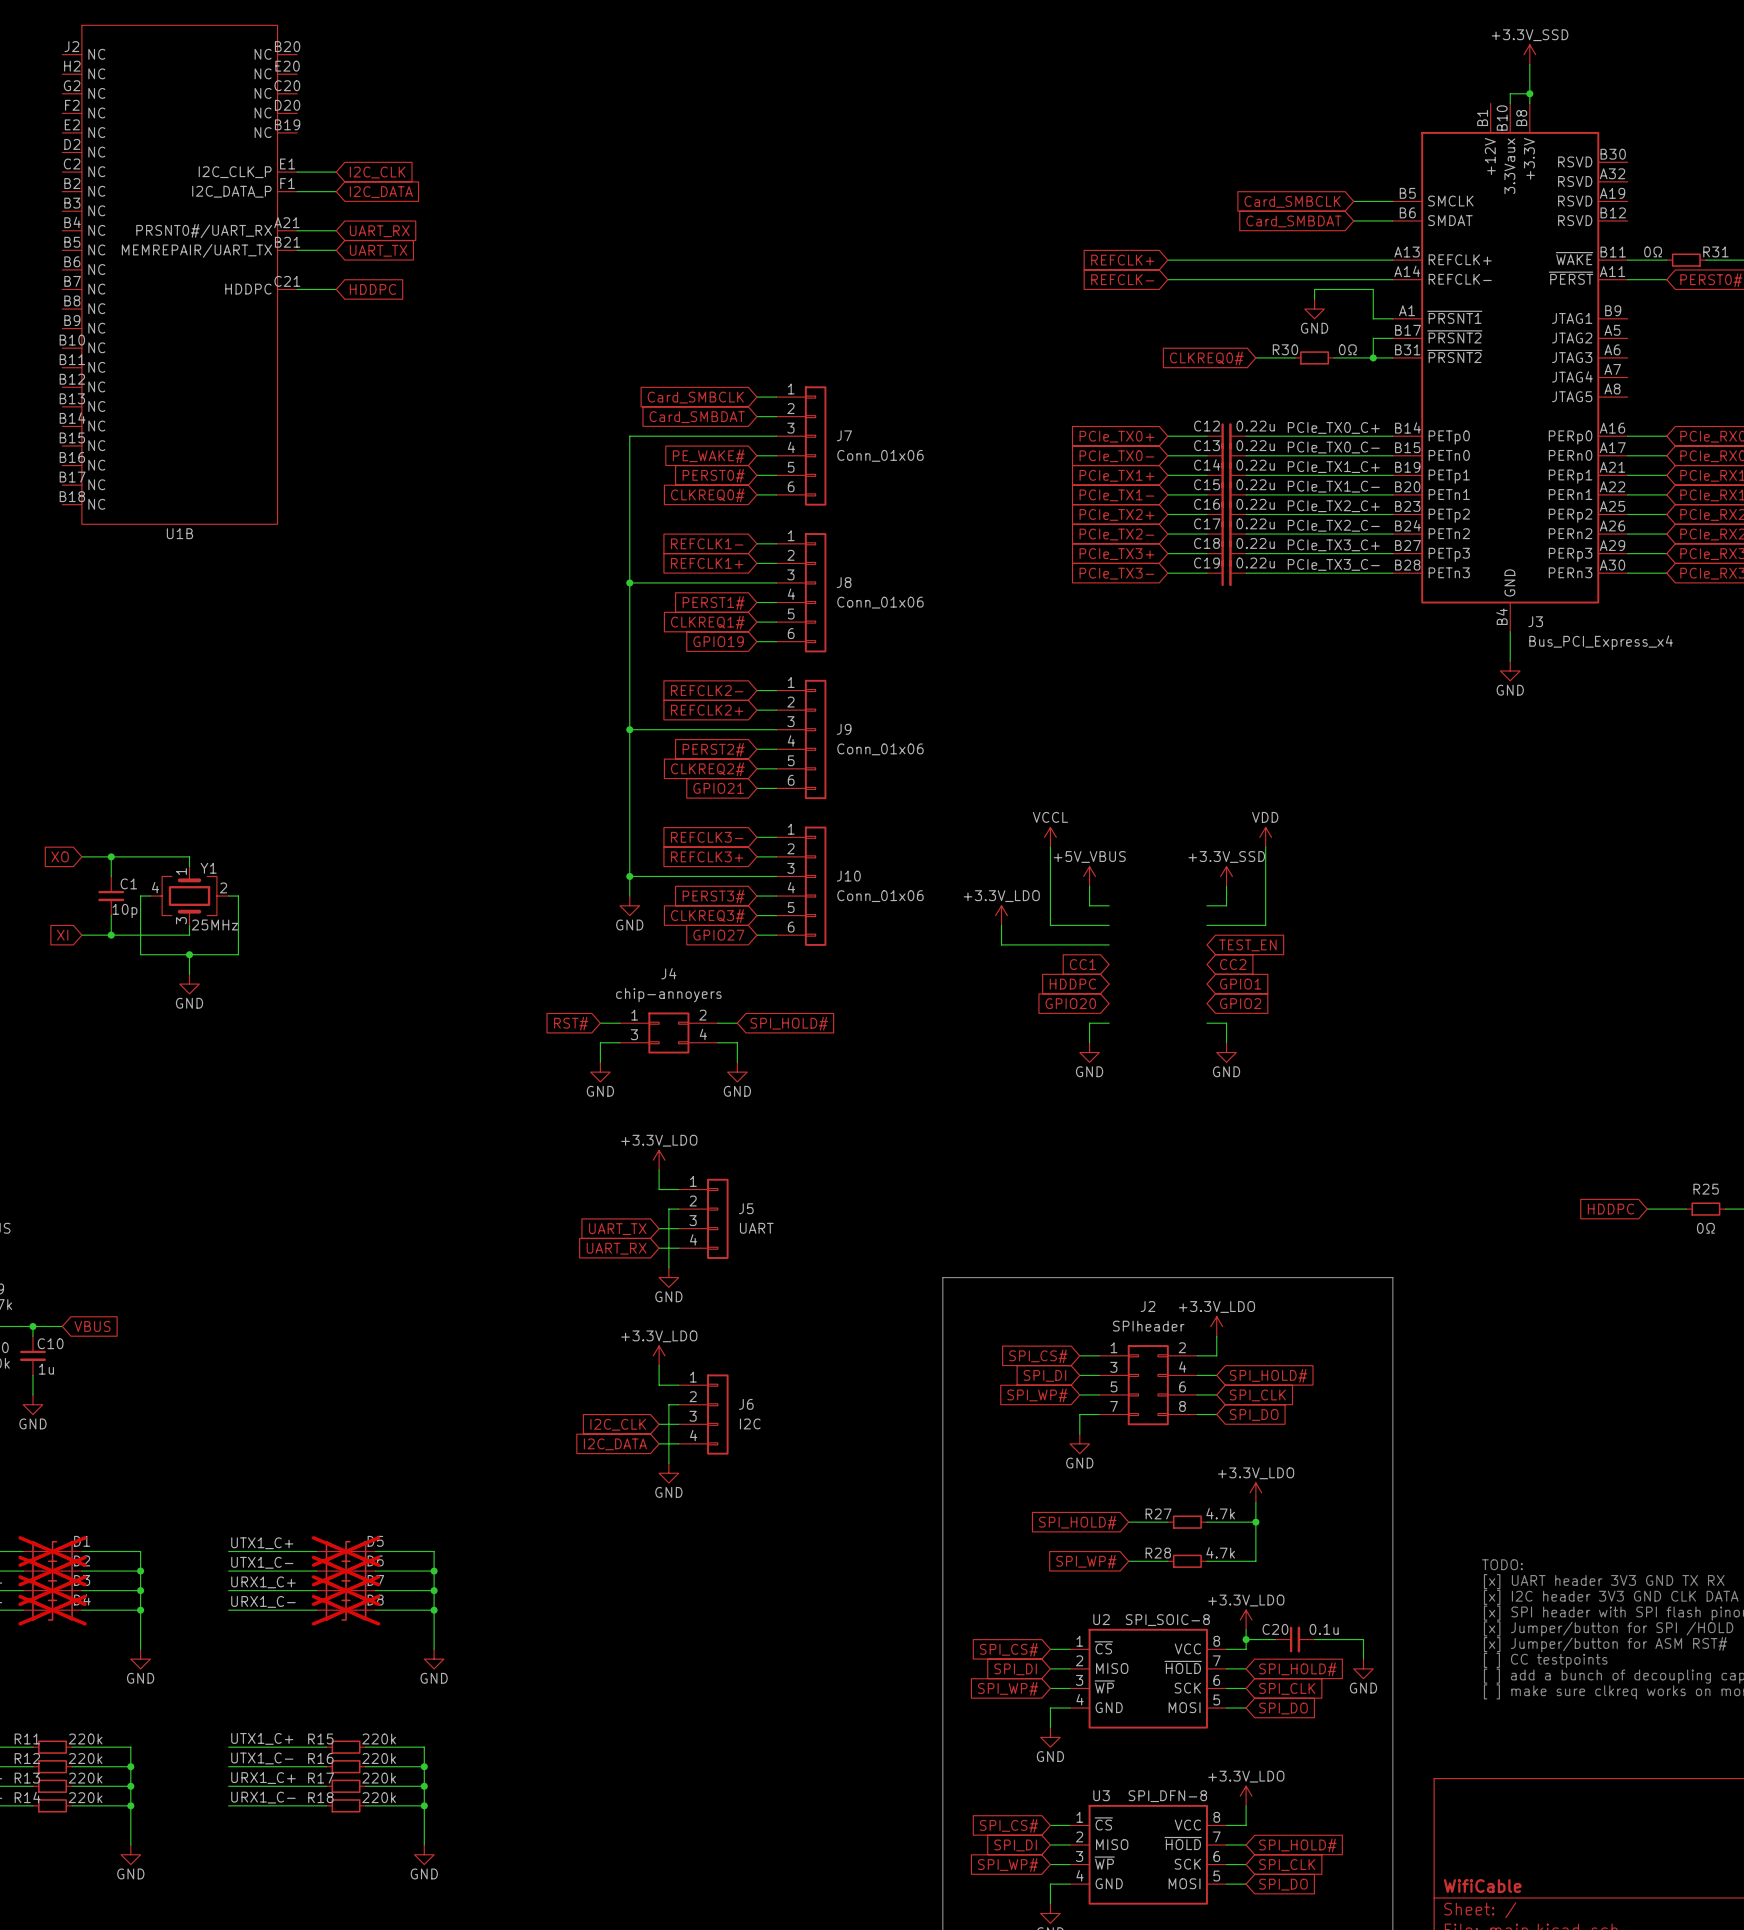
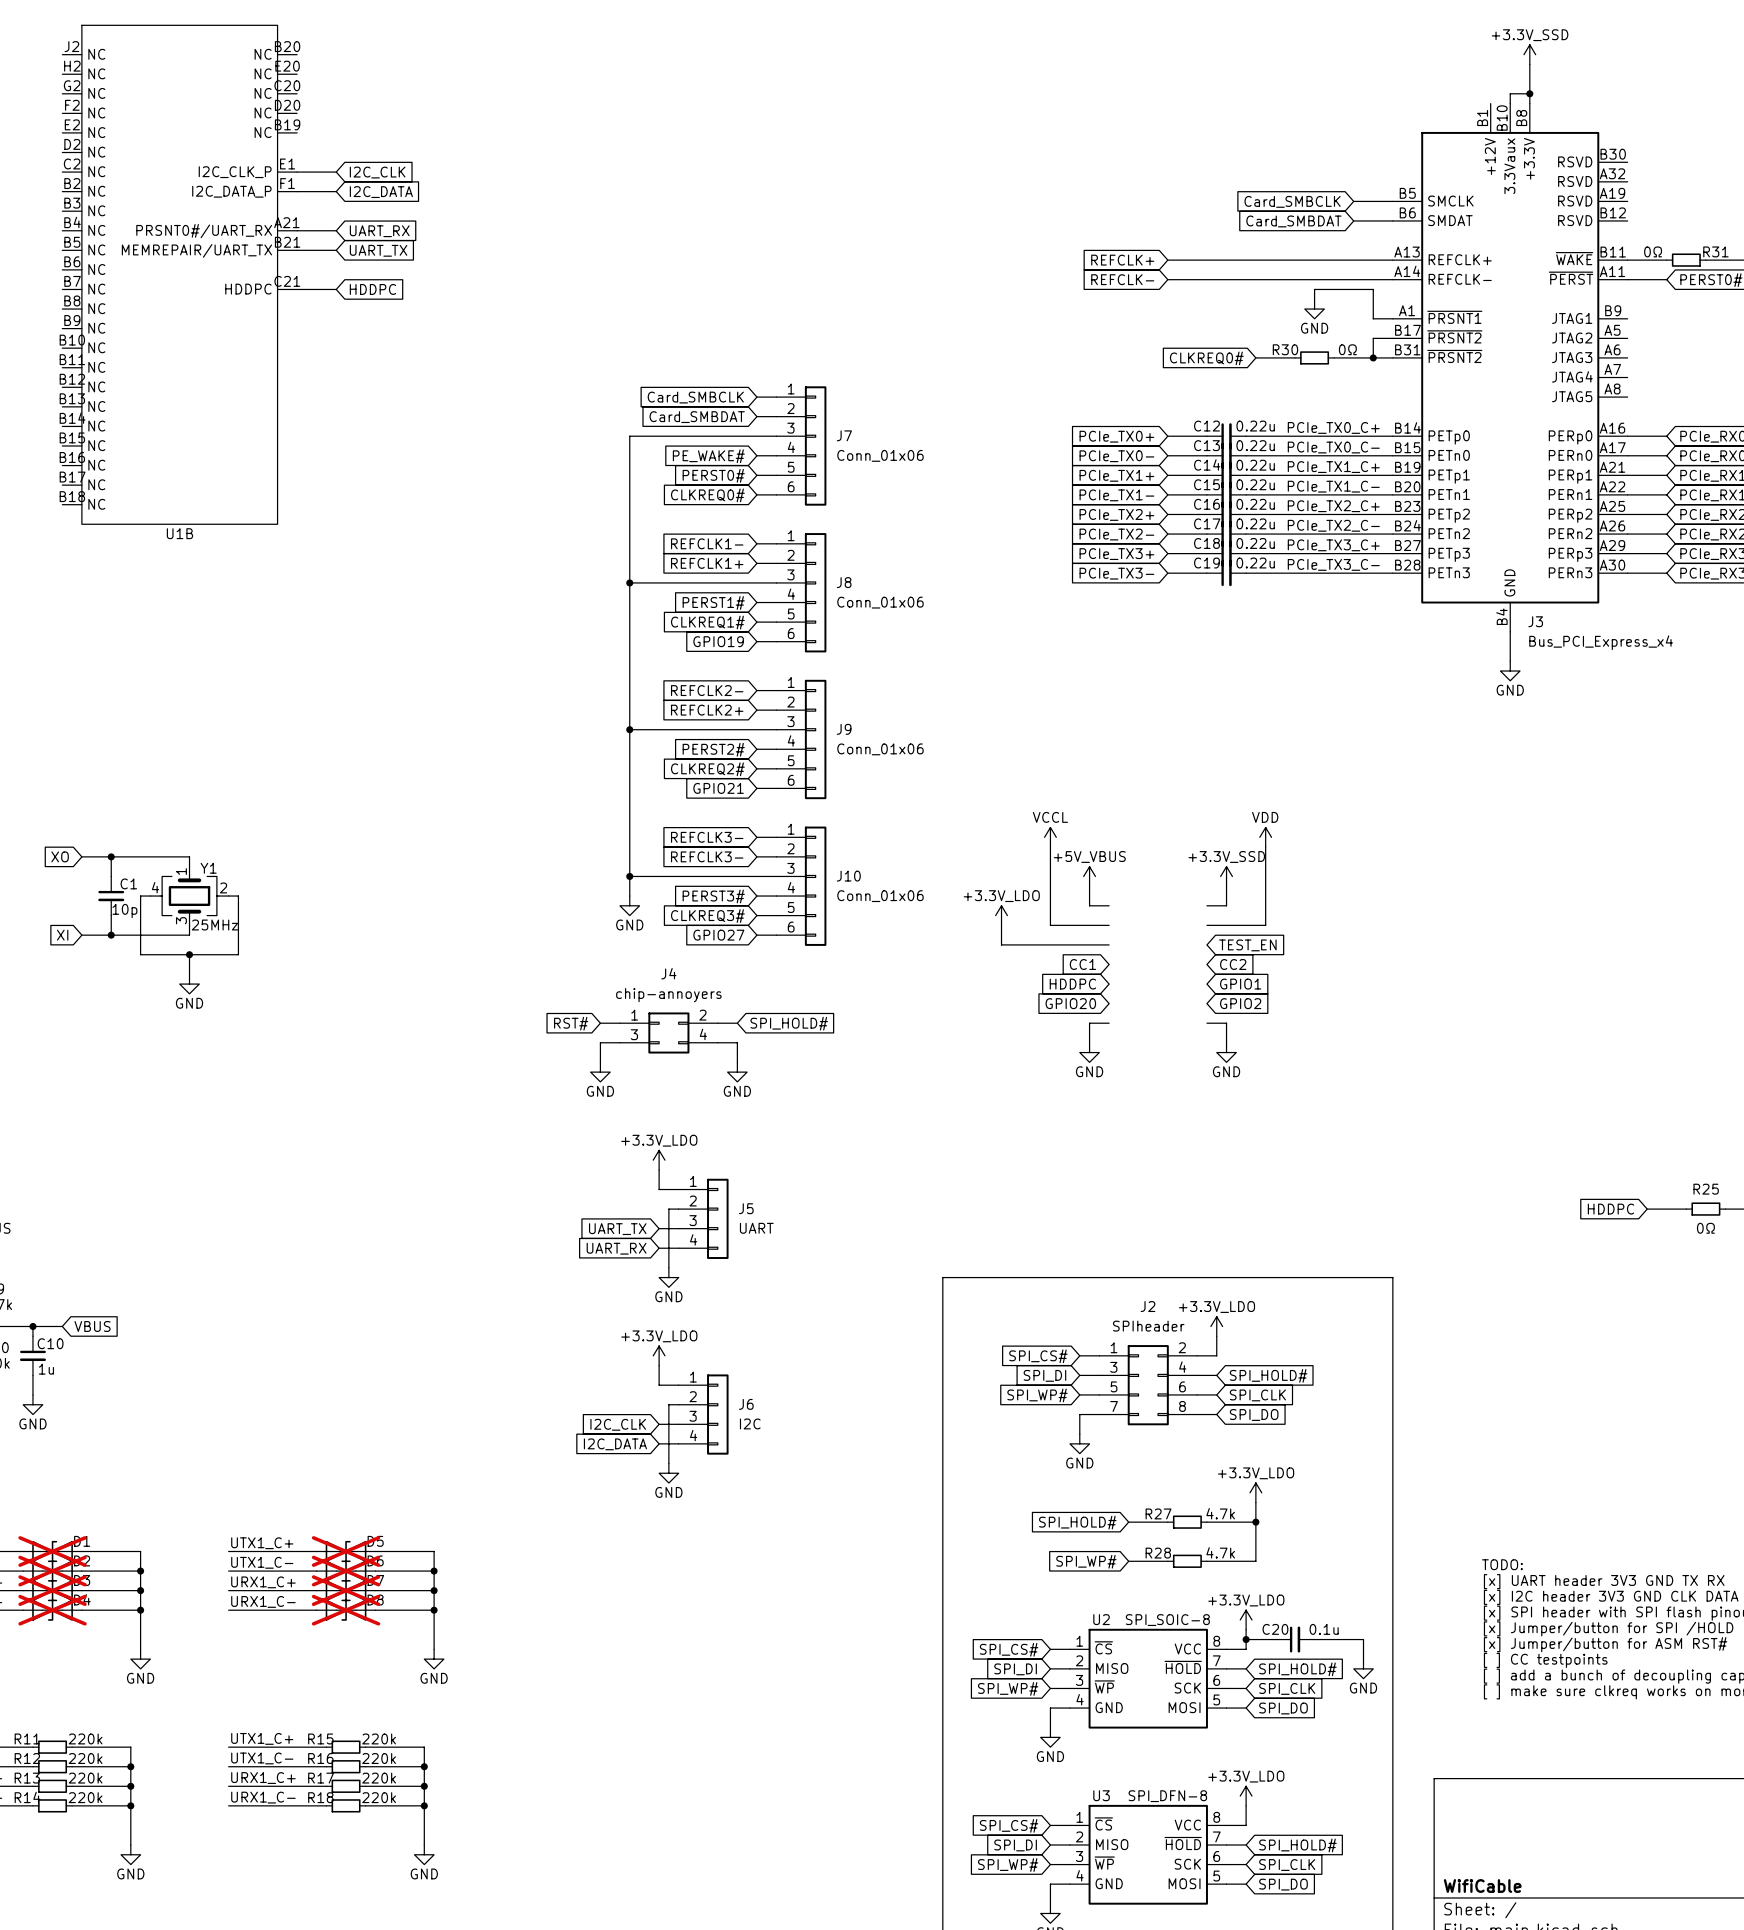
global label: REFCLK3+ (707, 856) -> REFCLK3- (707, 856)

